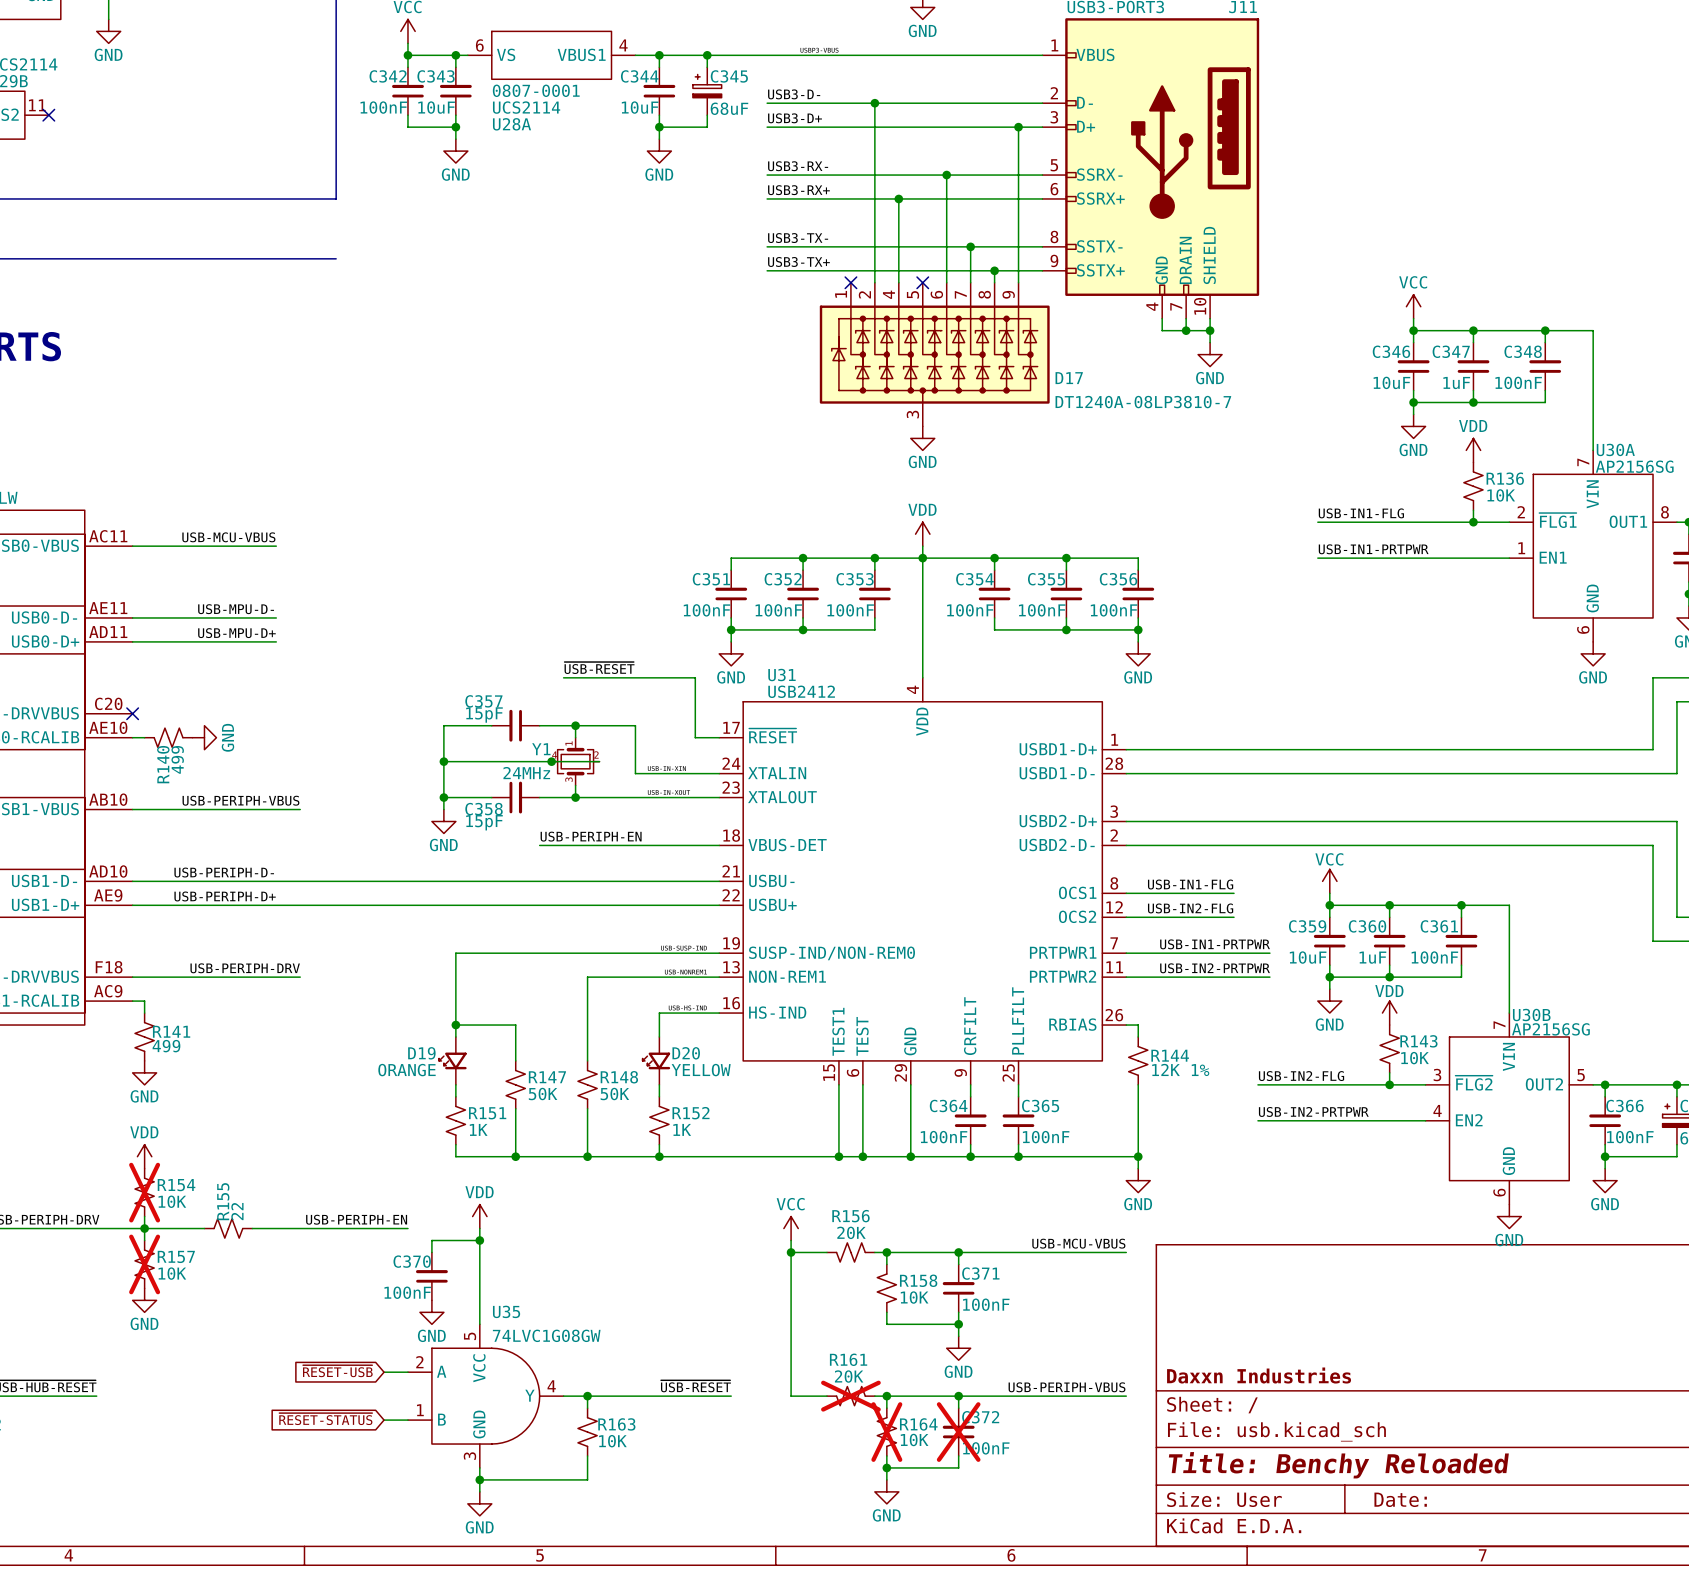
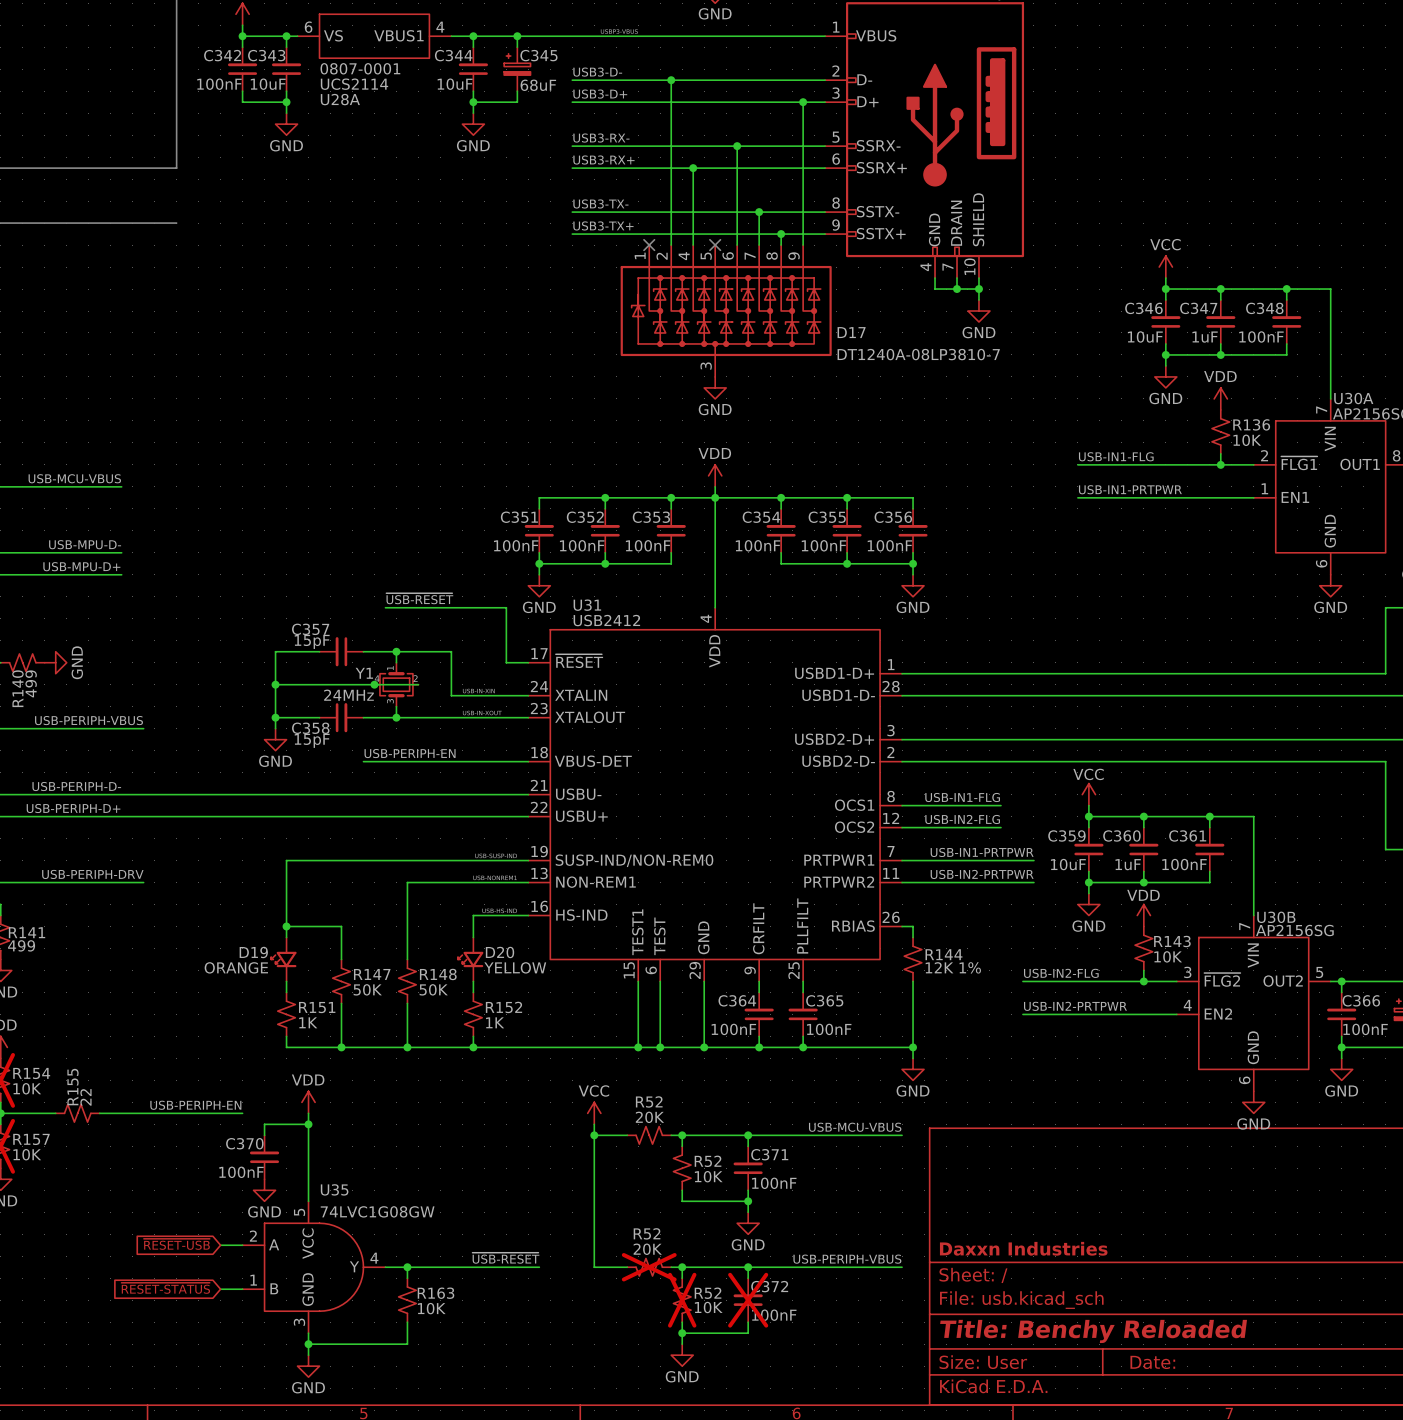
R156 name: R156 (850, 1216) -> R52 (649, 1101)
R158 name: R158 (918, 1280) -> R52 (708, 1161)
R161 name: R161 (848, 1359) -> R52 (647, 1233)
R164 name: R164 (918, 1424) -> R52 (708, 1293)

